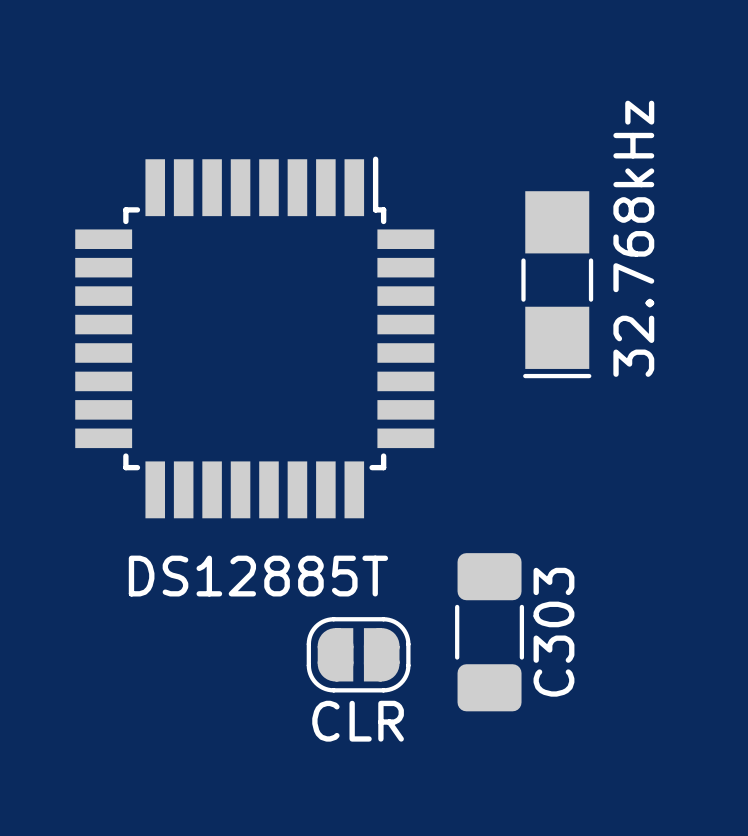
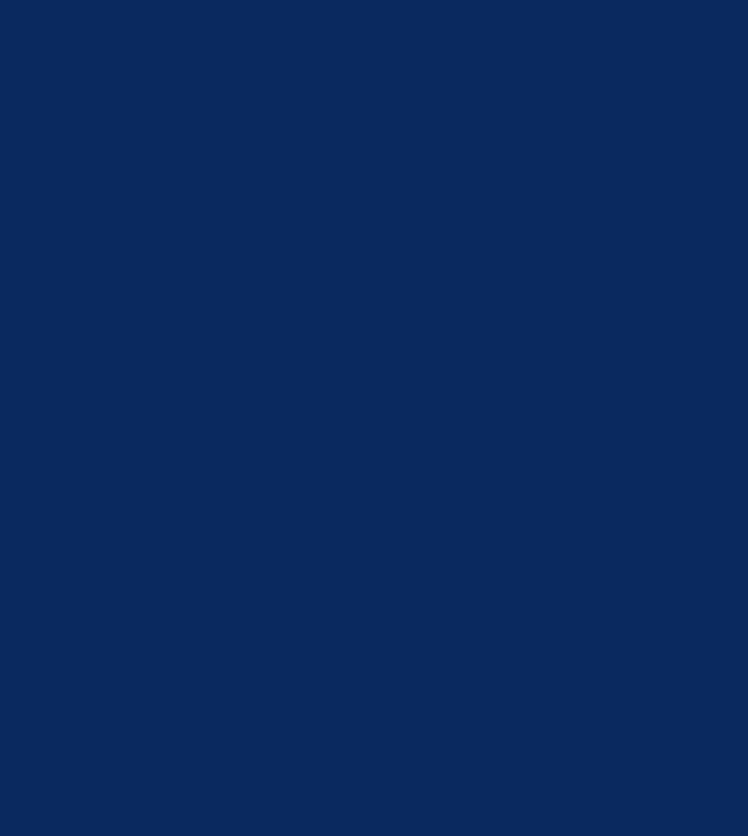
part: 32.768kHz (557, 284) -> none
part: DS12885T (254, 337) -> none
C303: (489, 632) -> none
part: CLR (358, 654) -> none

